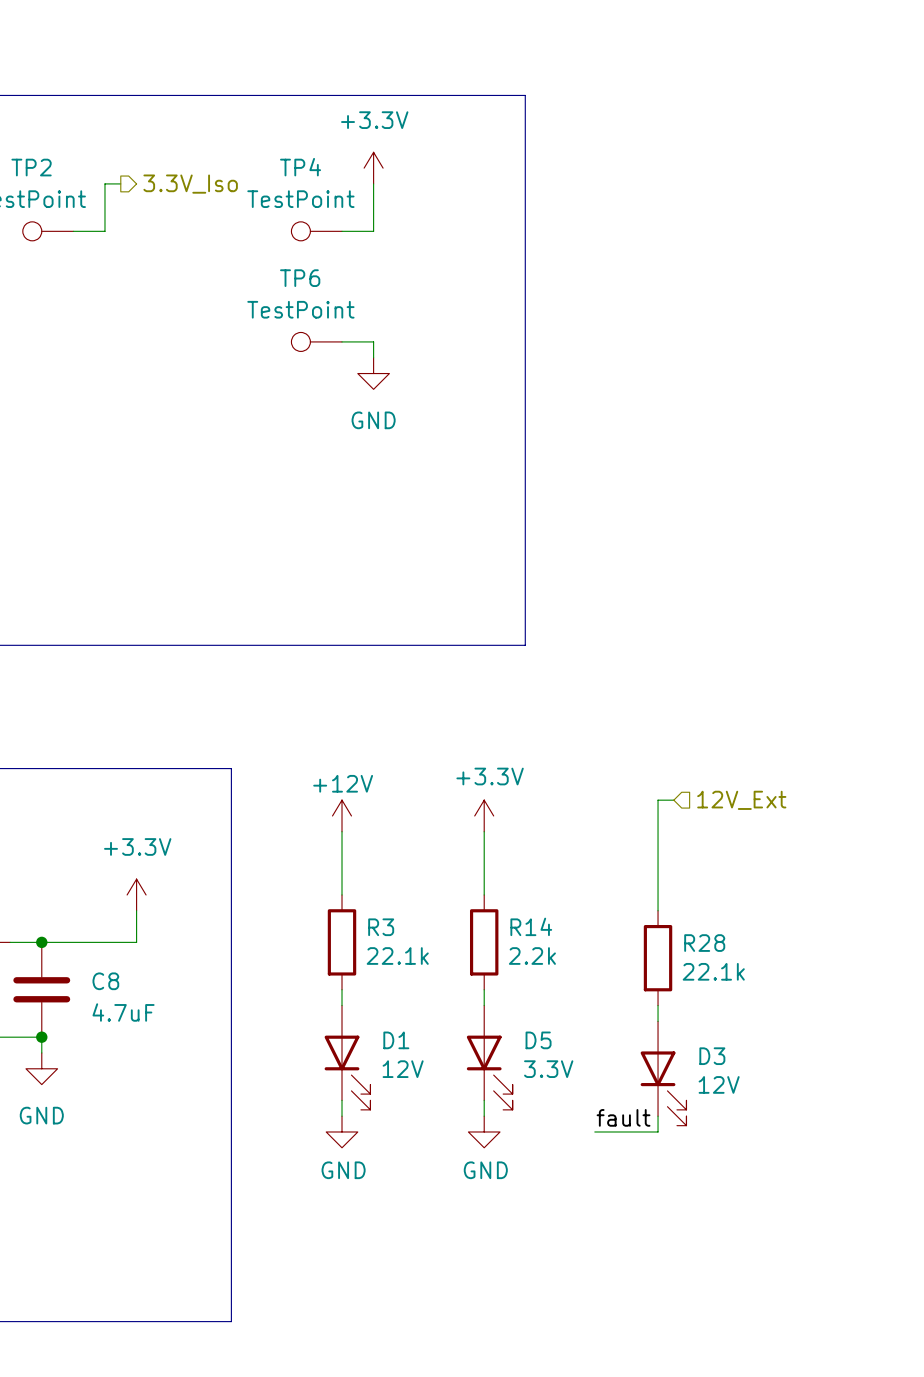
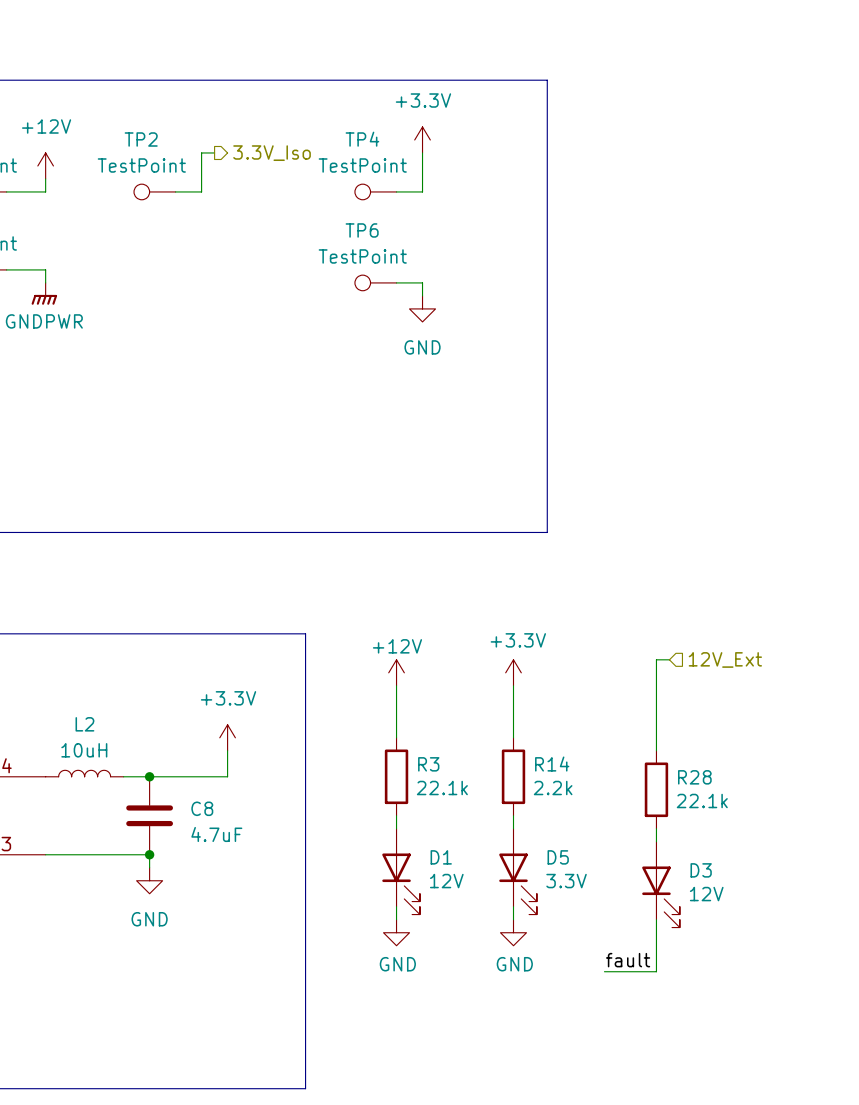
label position: fault (623, 1117) -> fault (628, 960)
wire: (594, 1131) (658, 1131) -> (604, 971) (656, 971) (656, 932)

